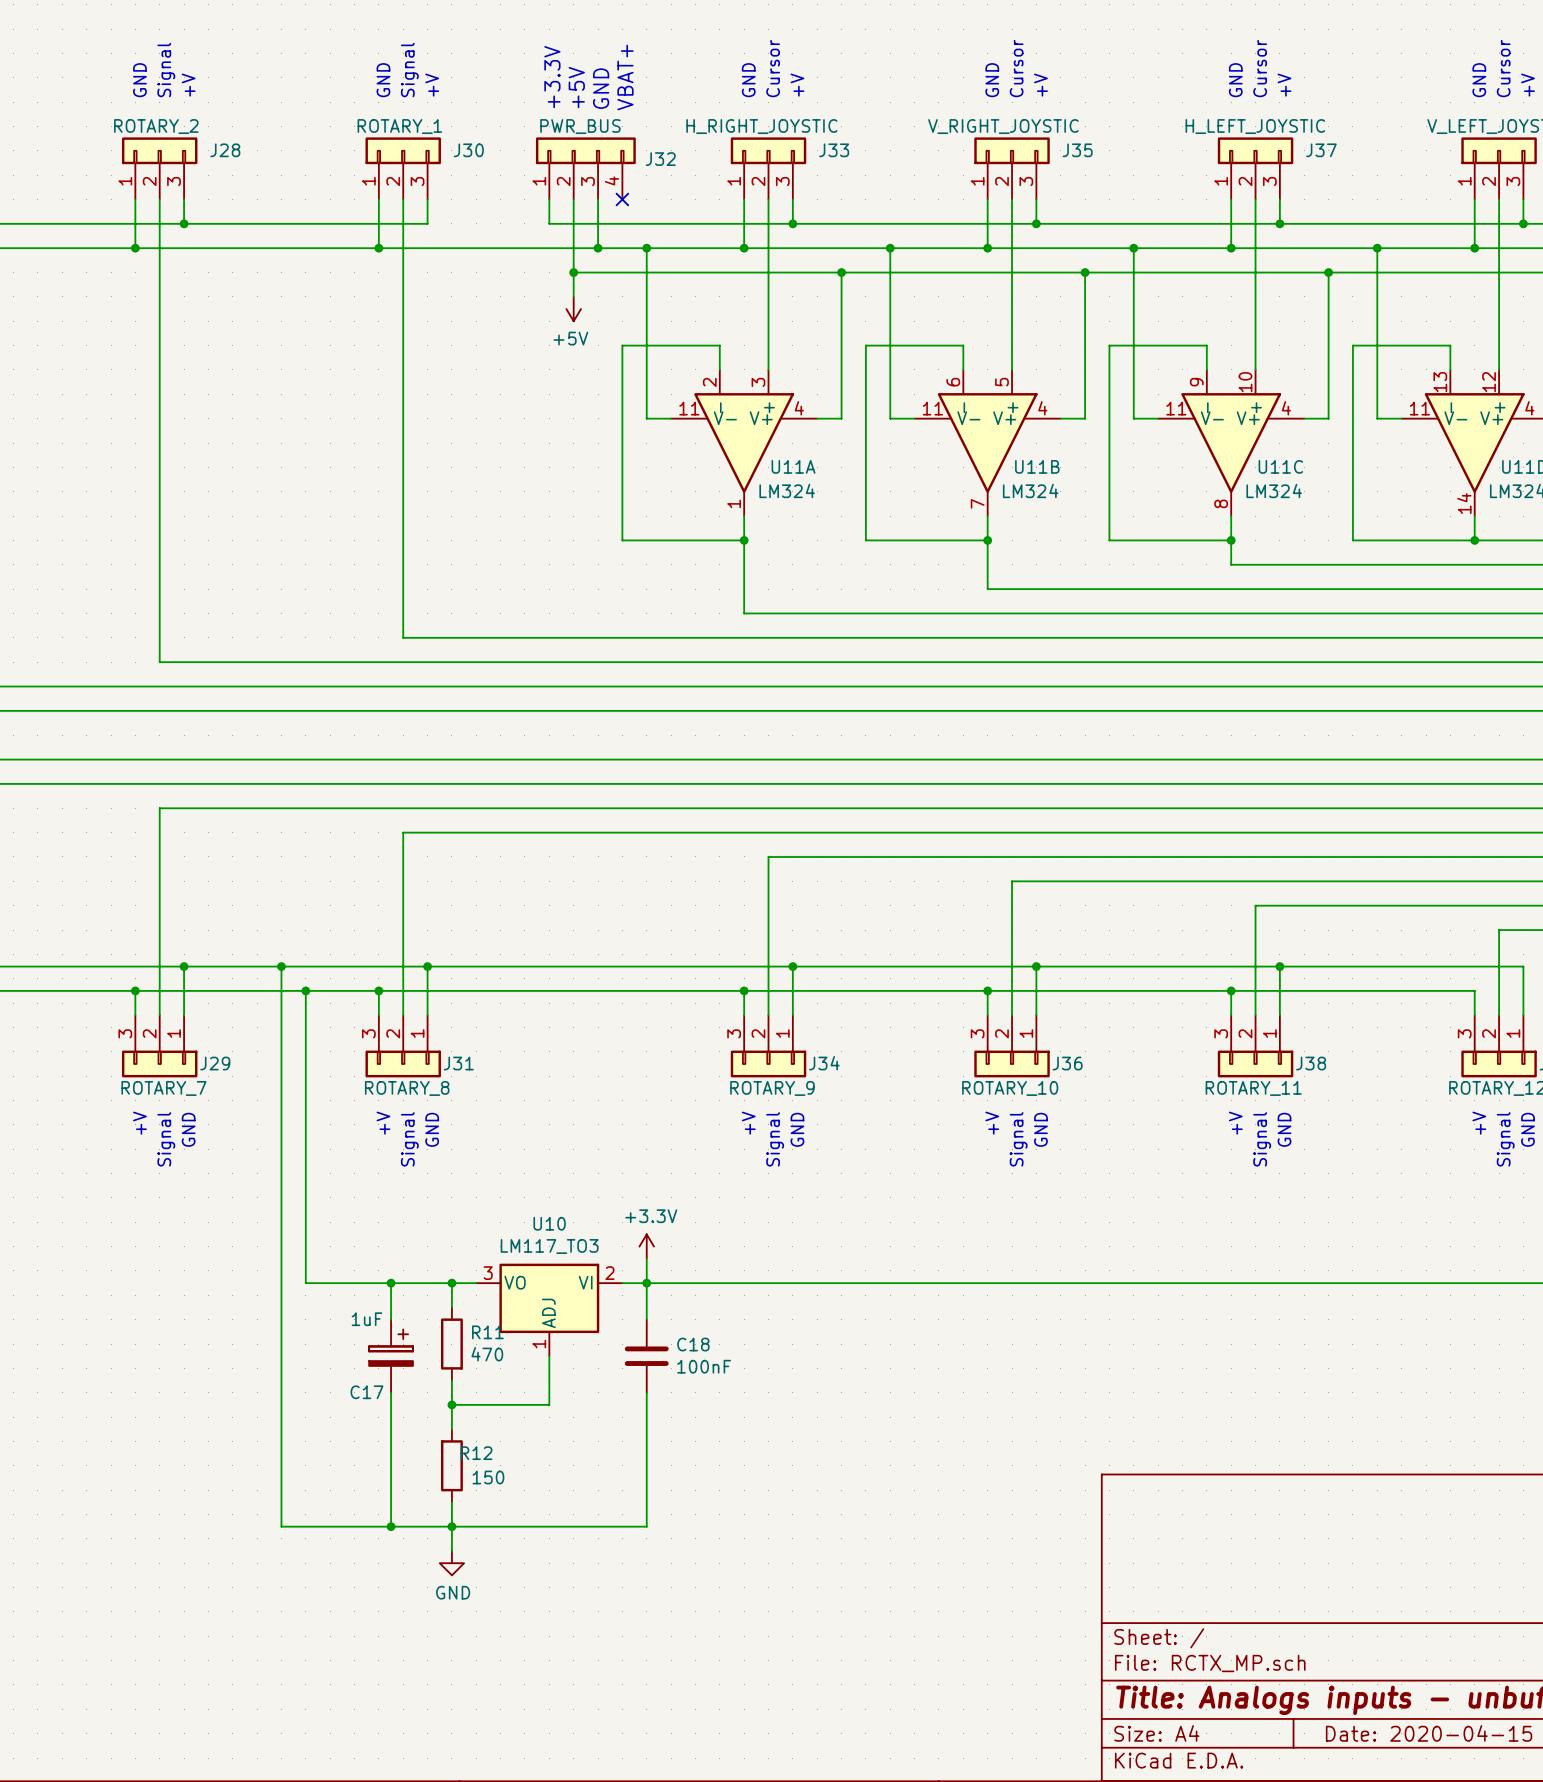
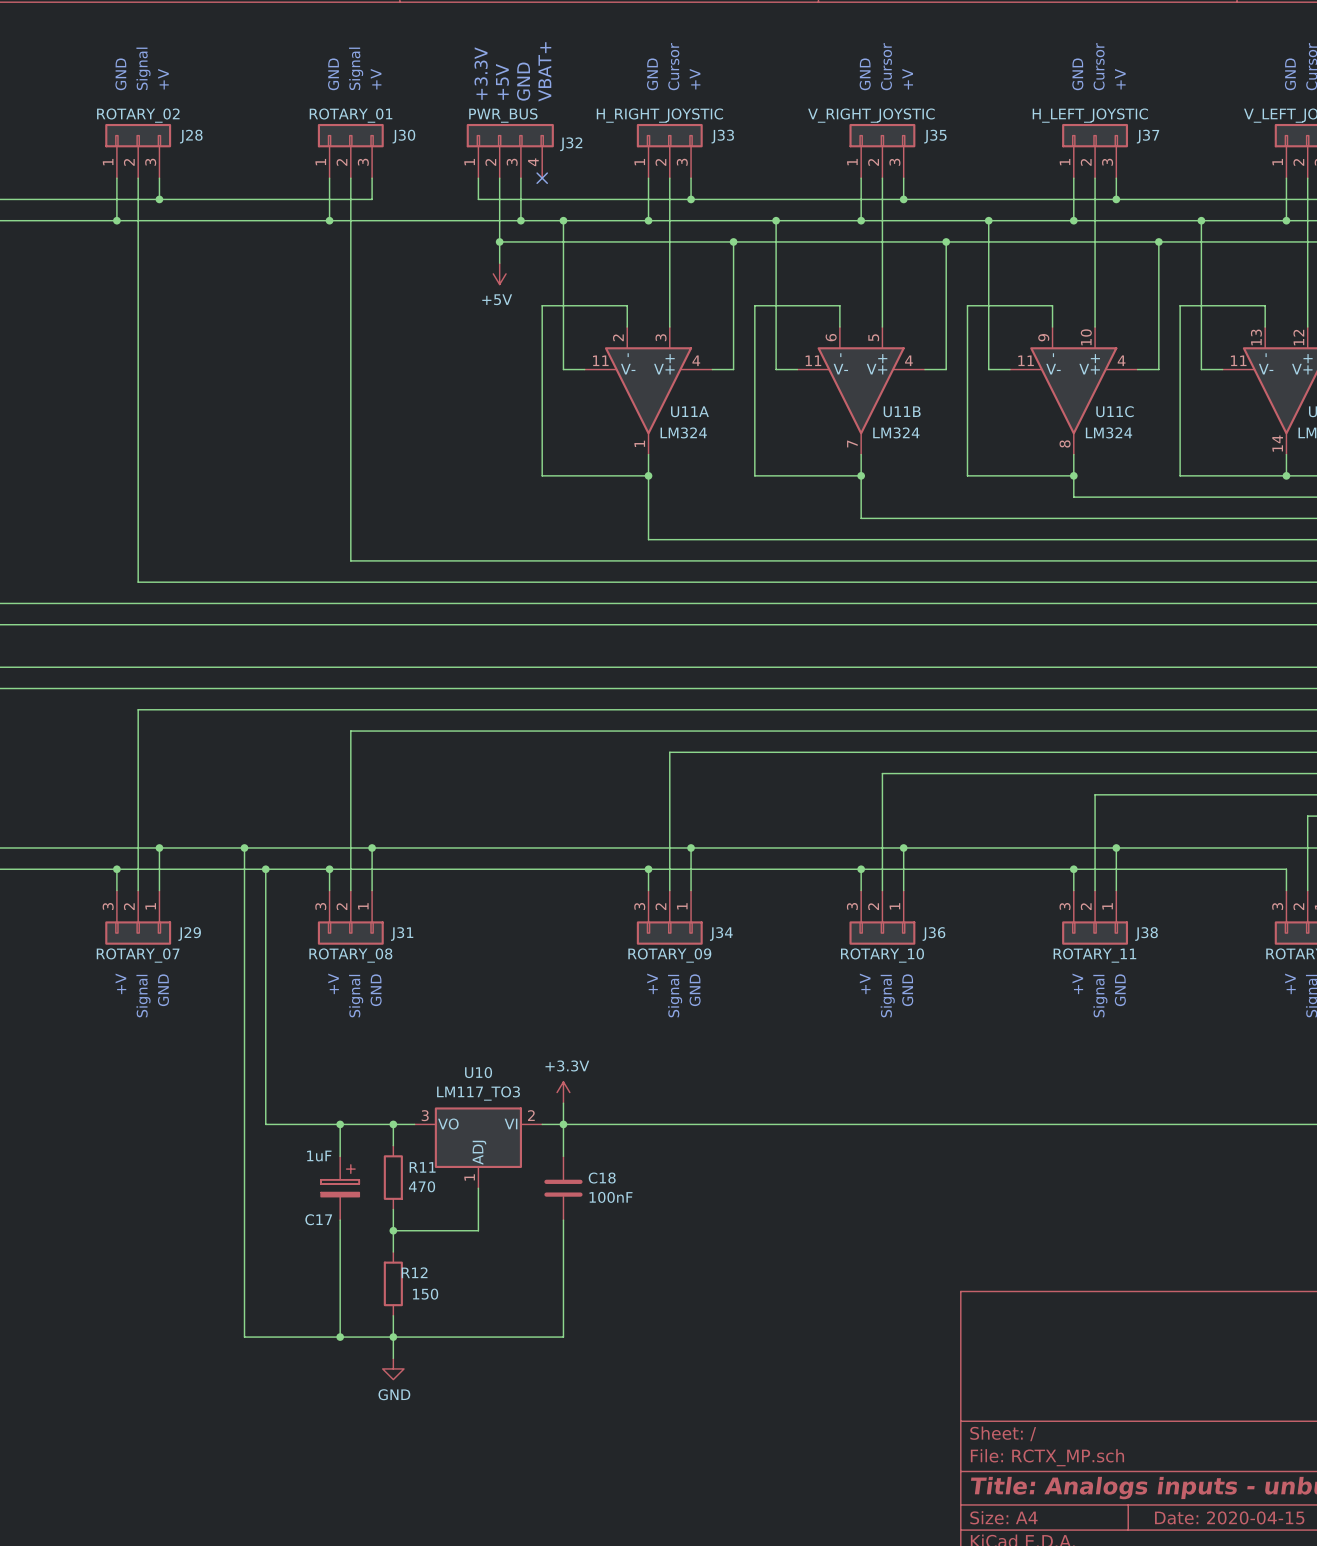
J28 value: ROTARY_2 (156, 126) -> ROTARY_02 (138, 115)
J30 value: ROTARY_1 (399, 126) -> ROTARY_01 (351, 115)
J29 value: ROTARY_7 (163, 1088) -> ROTARY_07 (138, 955)
J31 value: ROTARY_8 (407, 1088) -> ROTARY_08 (350, 955)
J34 value: ROTARY_9 (772, 1088) -> ROTARY_09 (669, 955)

